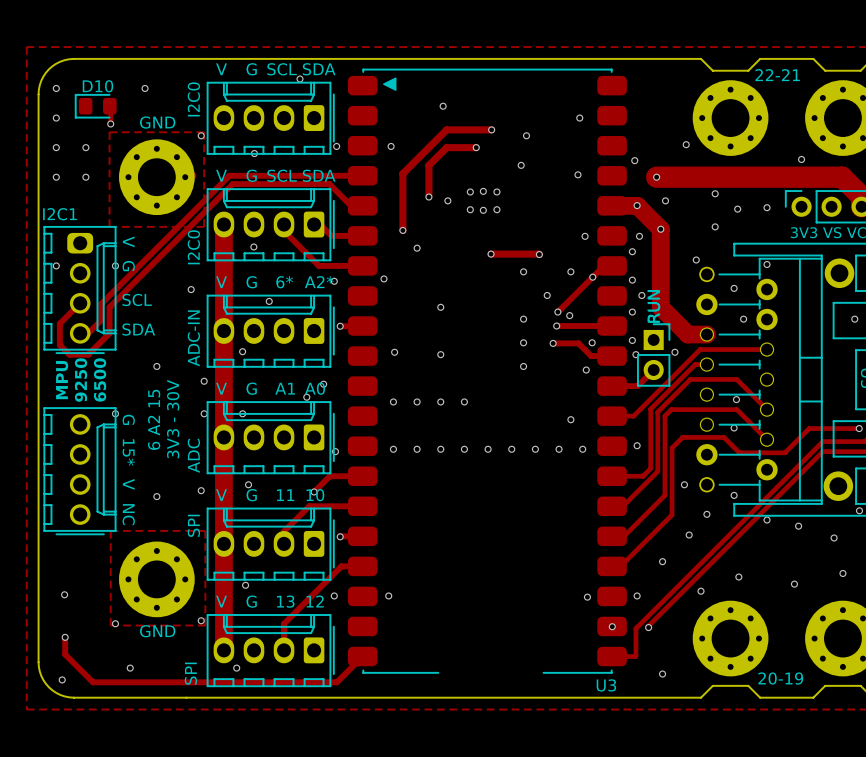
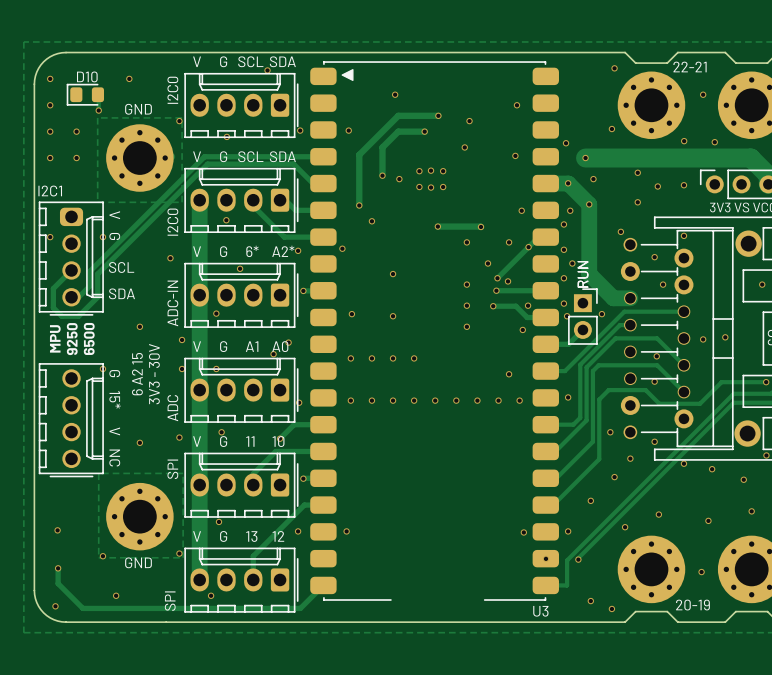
via: none -> (614, 68)
via: none -> (703, 94)
via: none -> (684, 141)
via: none -> (725, 337)
via: none -> (703, 339)
via: none -> (701, 572)
via: none -> (611, 608)

